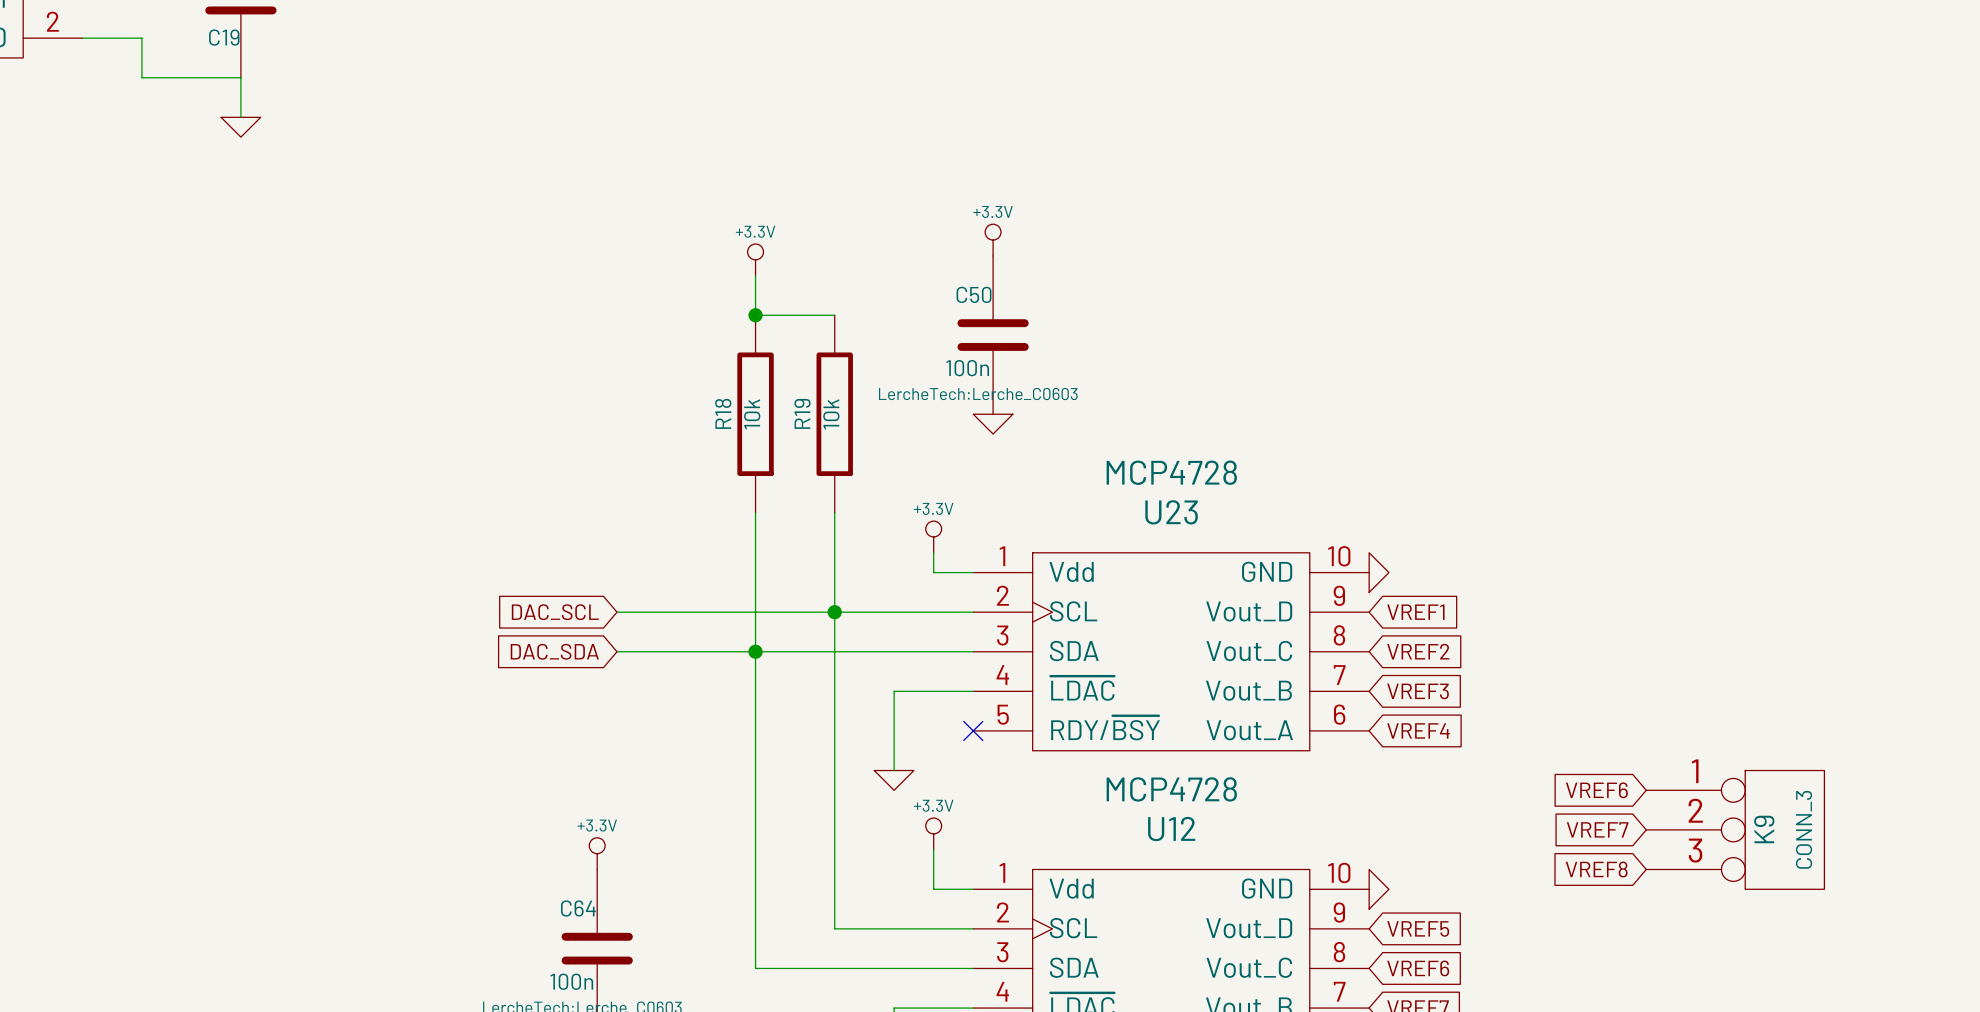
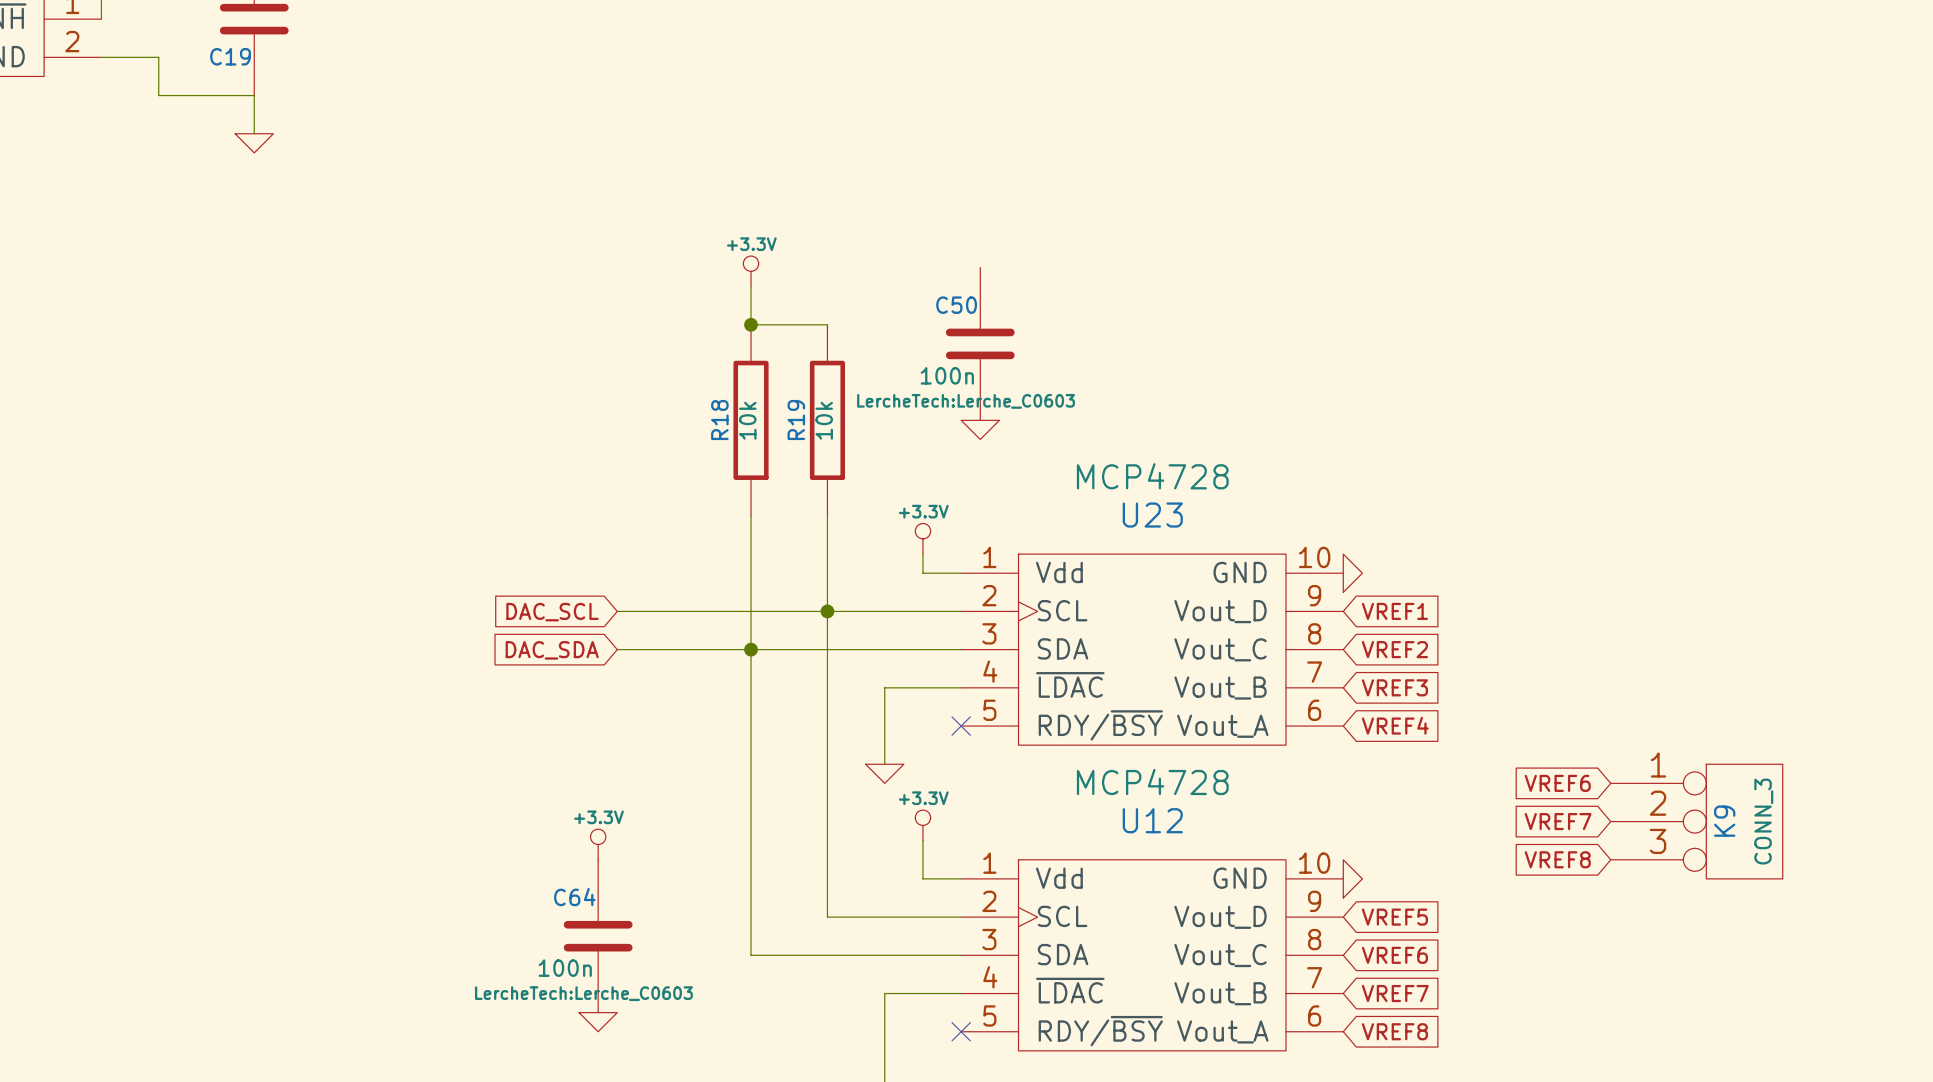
power symbol: +3.3V (993, 240) -> none

